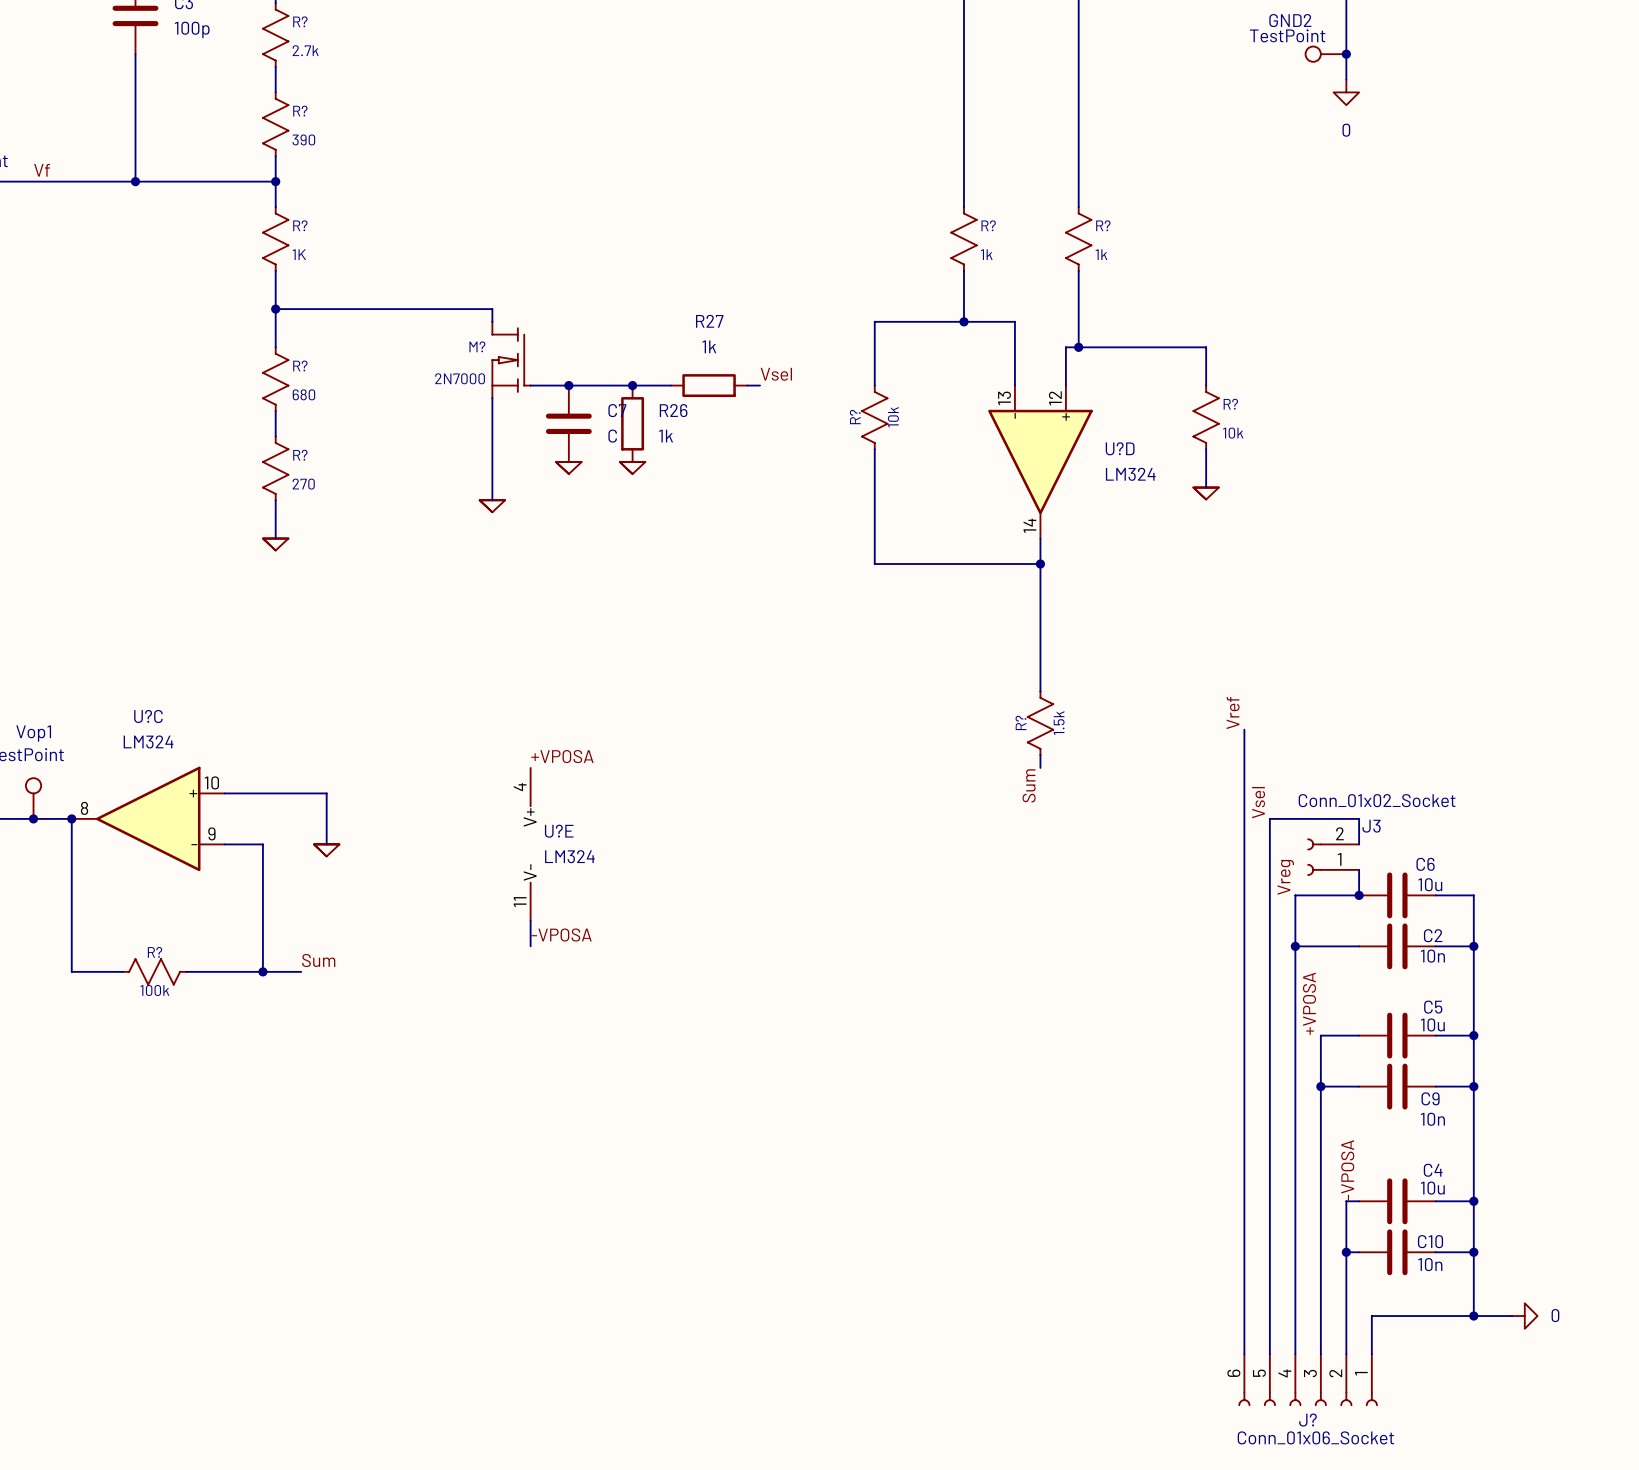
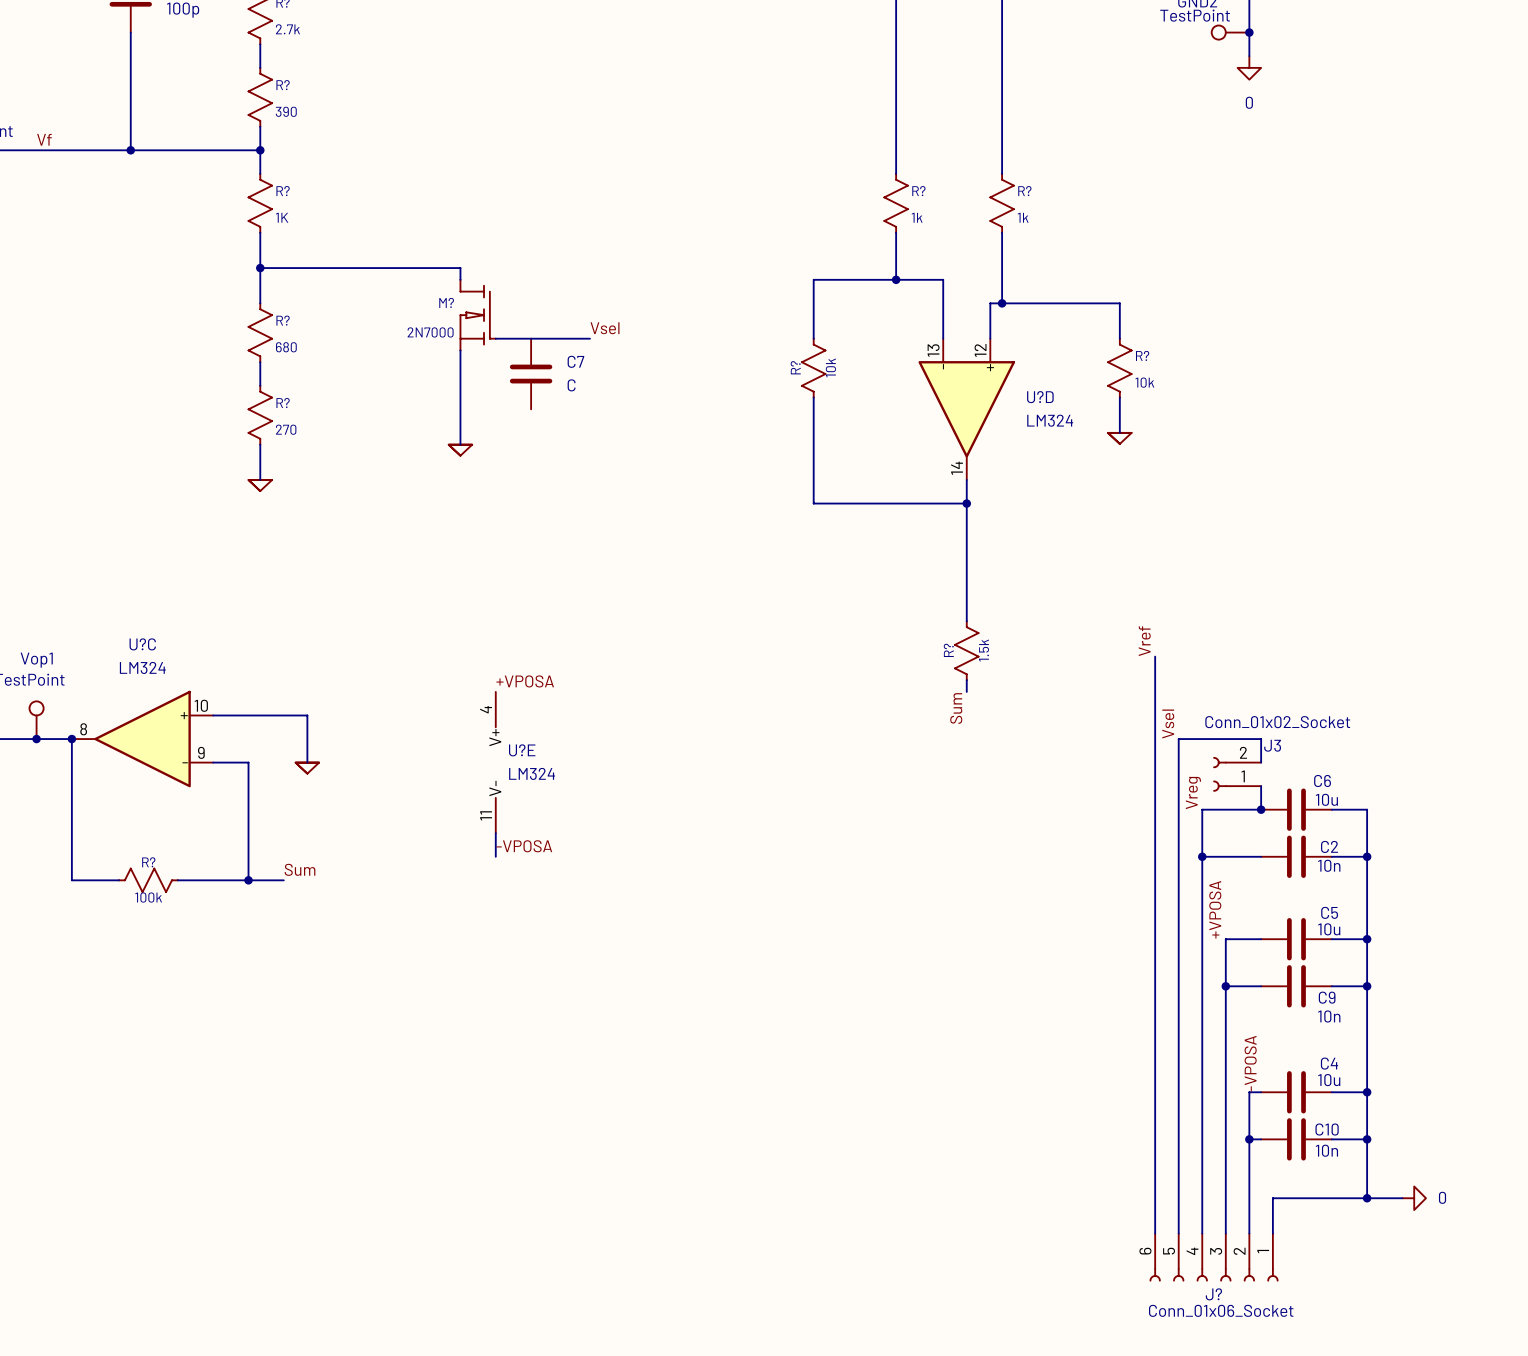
label position: Vsel (776, 374) -> Vsel (605, 328)
junction: (568, 385) -> none
wire: (632, 385) (670, 385) -> none
junction: (632, 385) -> none
R27: 1k (709, 385) -> none
wire: (747, 385) (760, 385) -> none
R26: 1k (632, 423) -> none
power symbol: (568, 468) -> none
power symbol: (632, 468) -> none

